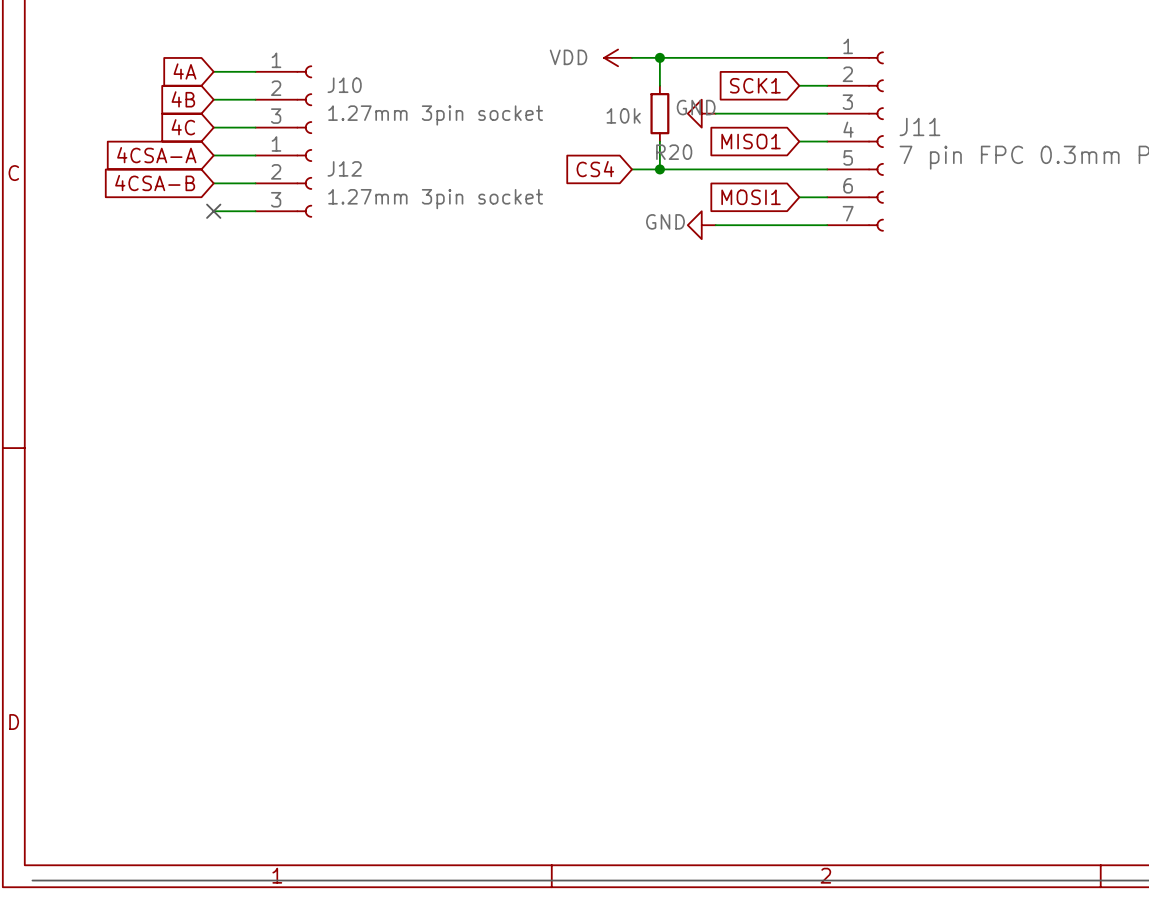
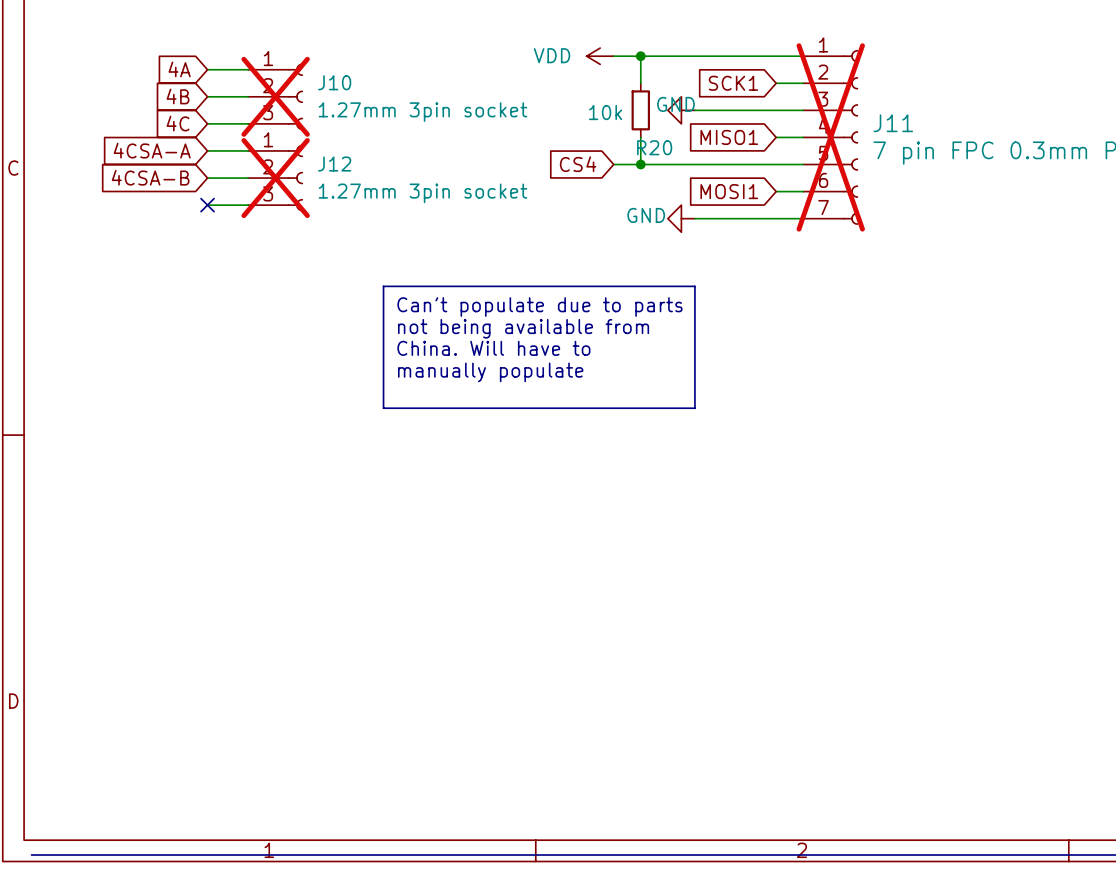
J10 do-not-place cross: none -> (275, 96)
J11 do-not-place cross: none -> (830, 137)
J12 do-not-place cross: none -> (275, 178)
line: none -> (383, 286) (694, 286) (694, 408) (383, 408) (383, 286)
text: none -> Can't populate due to parts (539, 307)
text: none -> not being available from (523, 328)
text: none -> China. Will have to (493, 348)
text: none -> manually populate (490, 372)

